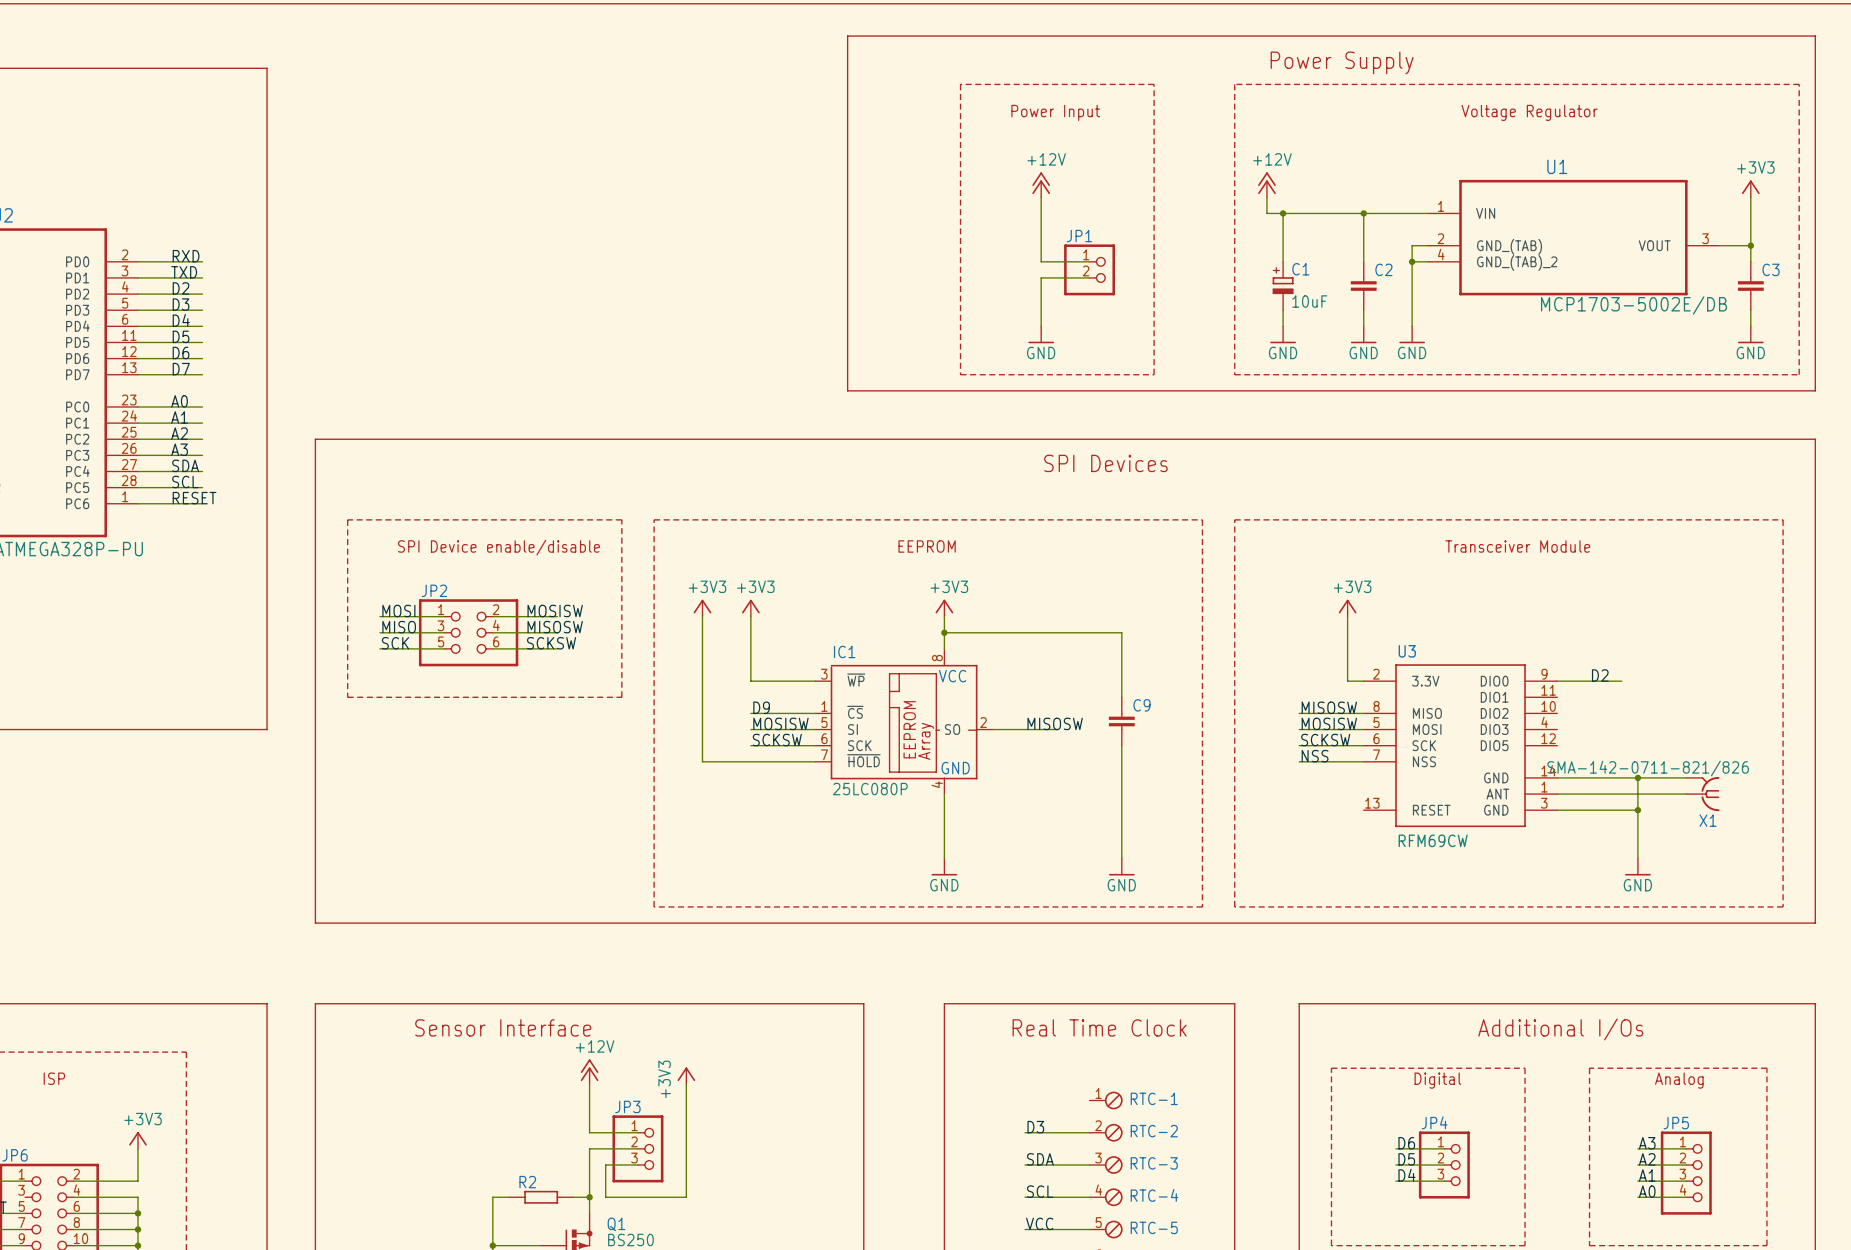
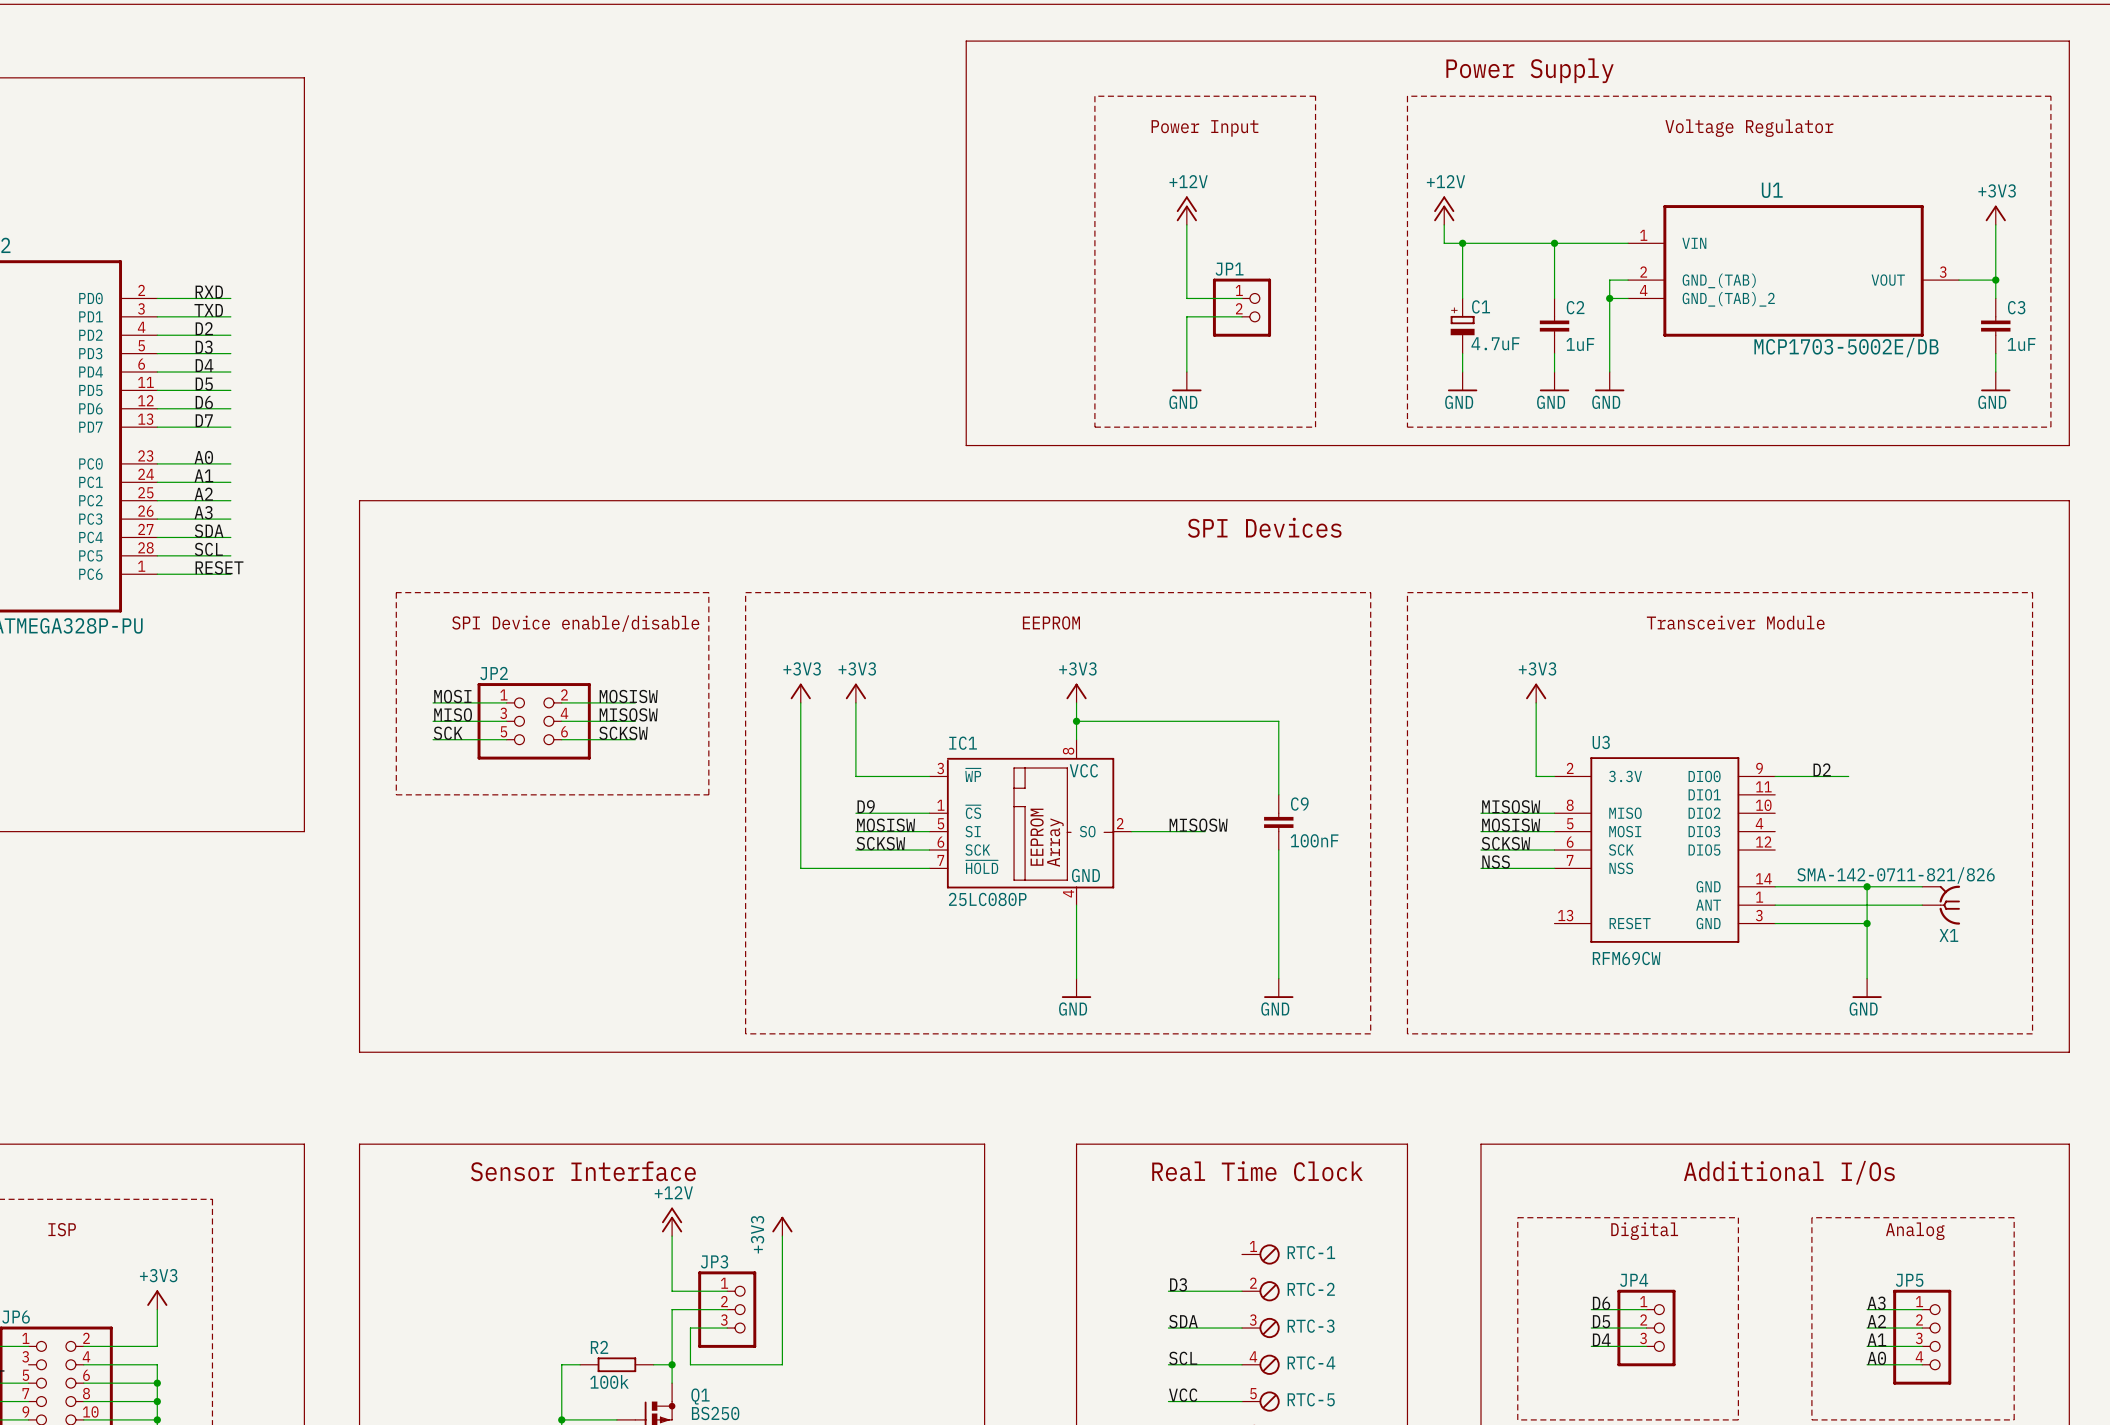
C1 value: 10uF (1309, 301) -> 4.7uF (1495, 343)
C2 value: none -> 1uF (1580, 344)
C3 value: none -> 1uF (2021, 344)
C9 value: none -> 100nF (1314, 840)
R2 value: none -> 100k (609, 1381)

